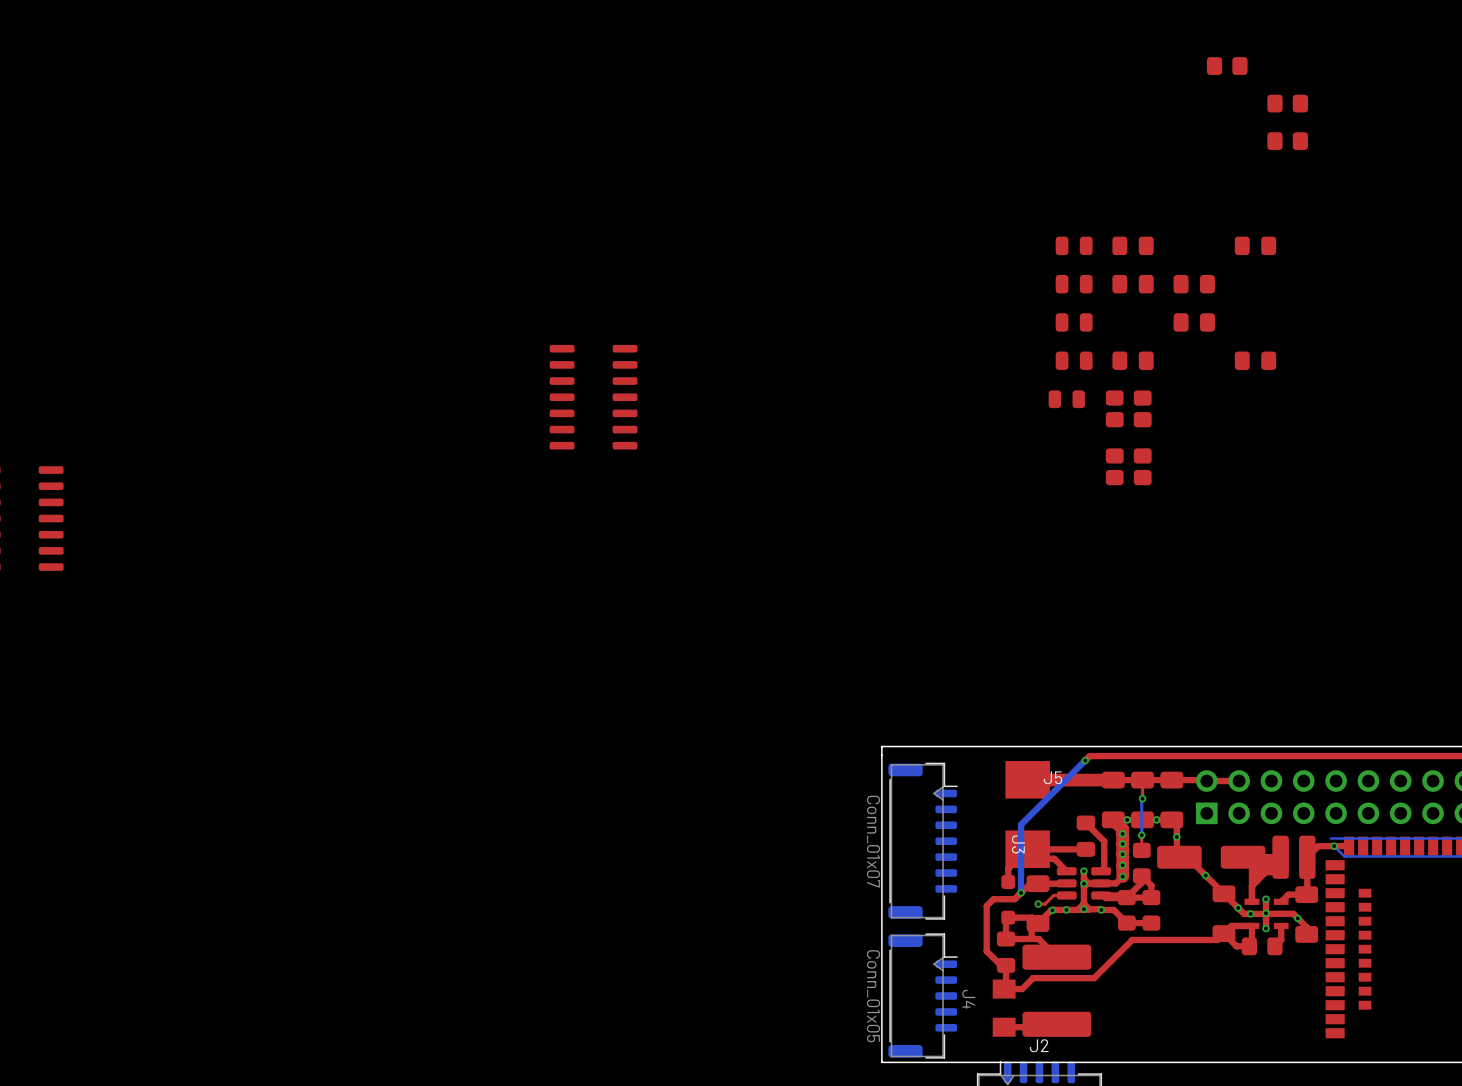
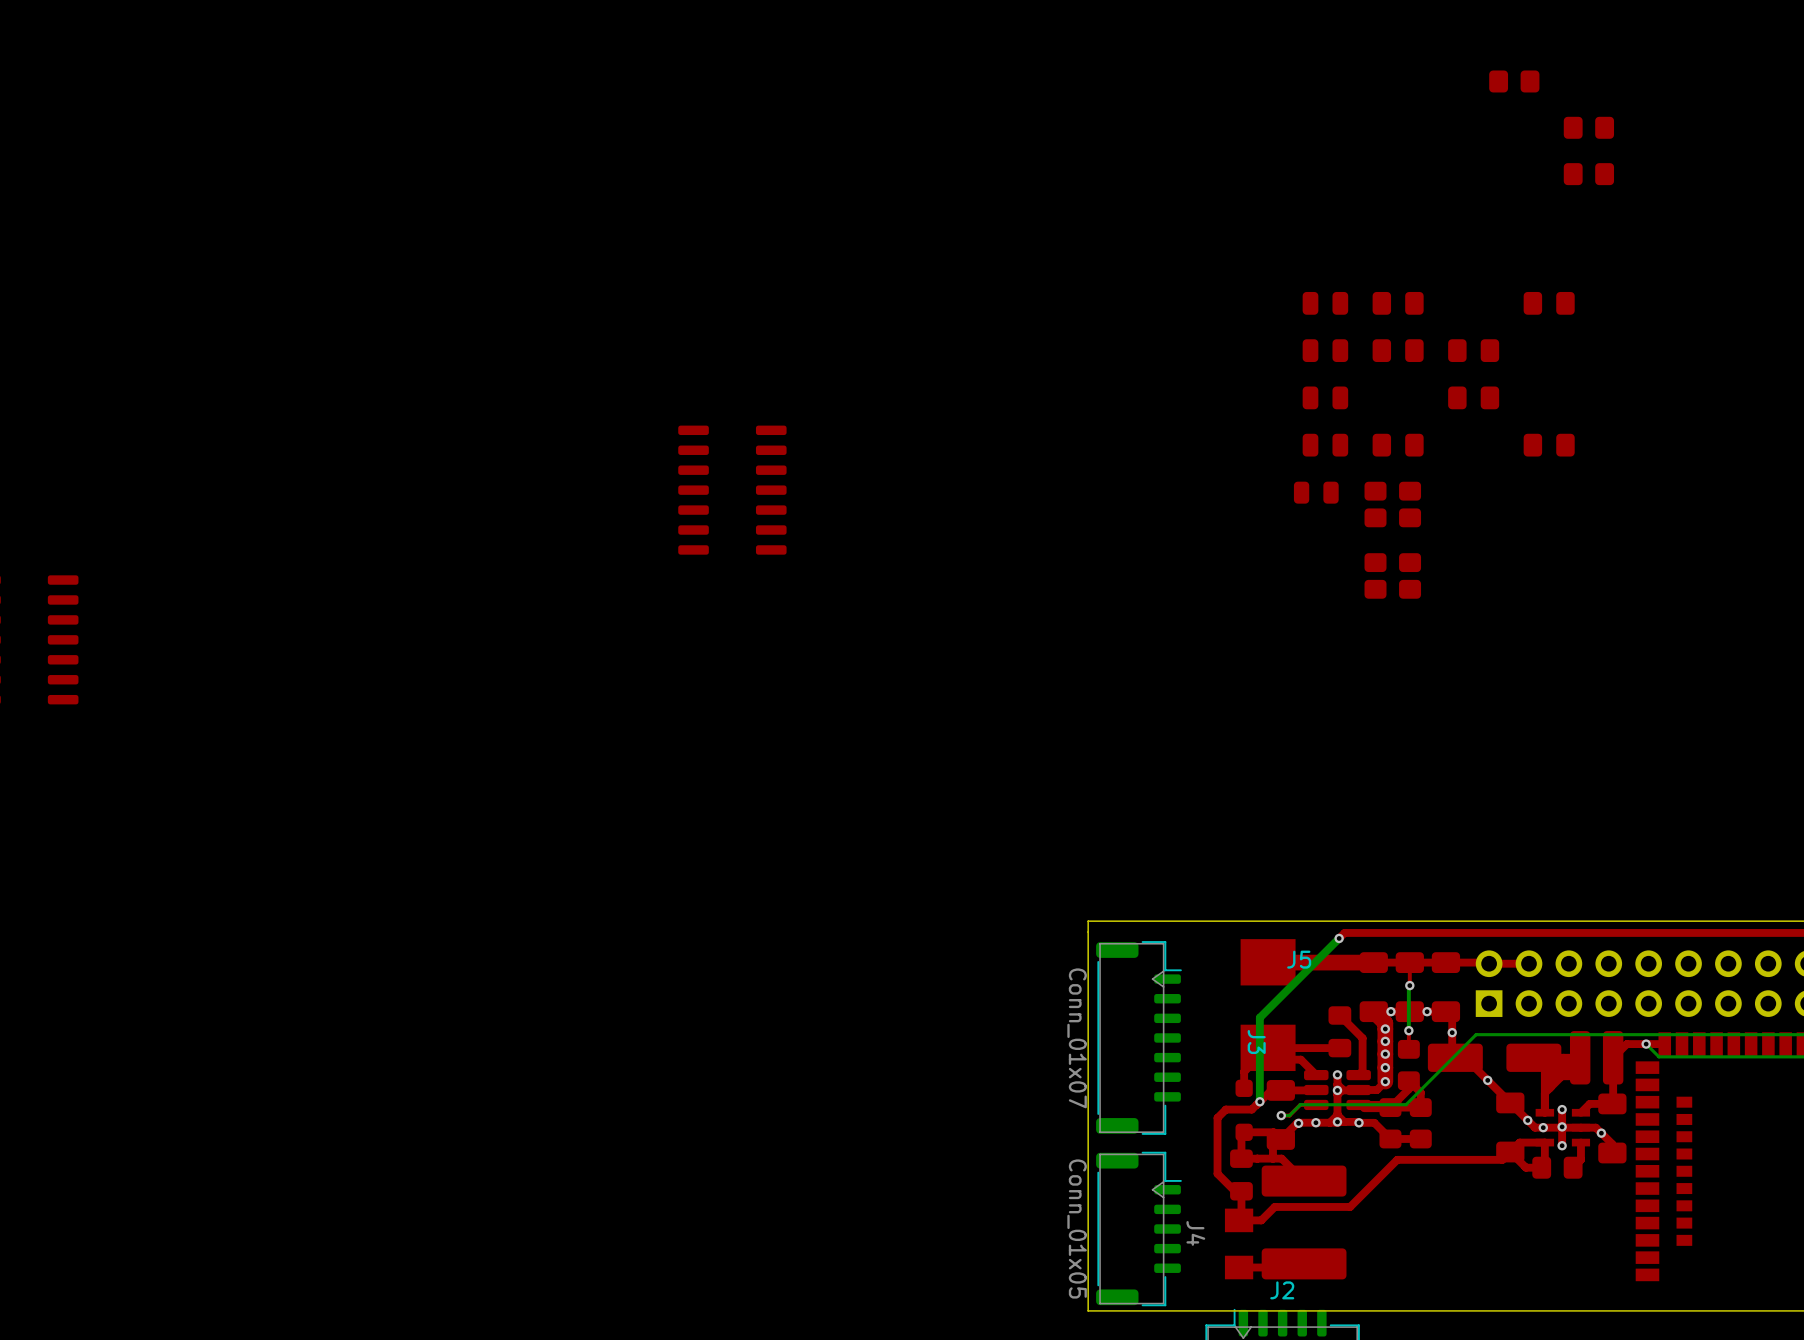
bottom track: none -> (1642, 1034) (1476, 1034) (1406, 1104) (1300, 1104) (1289, 1115) (1281, 1115)

